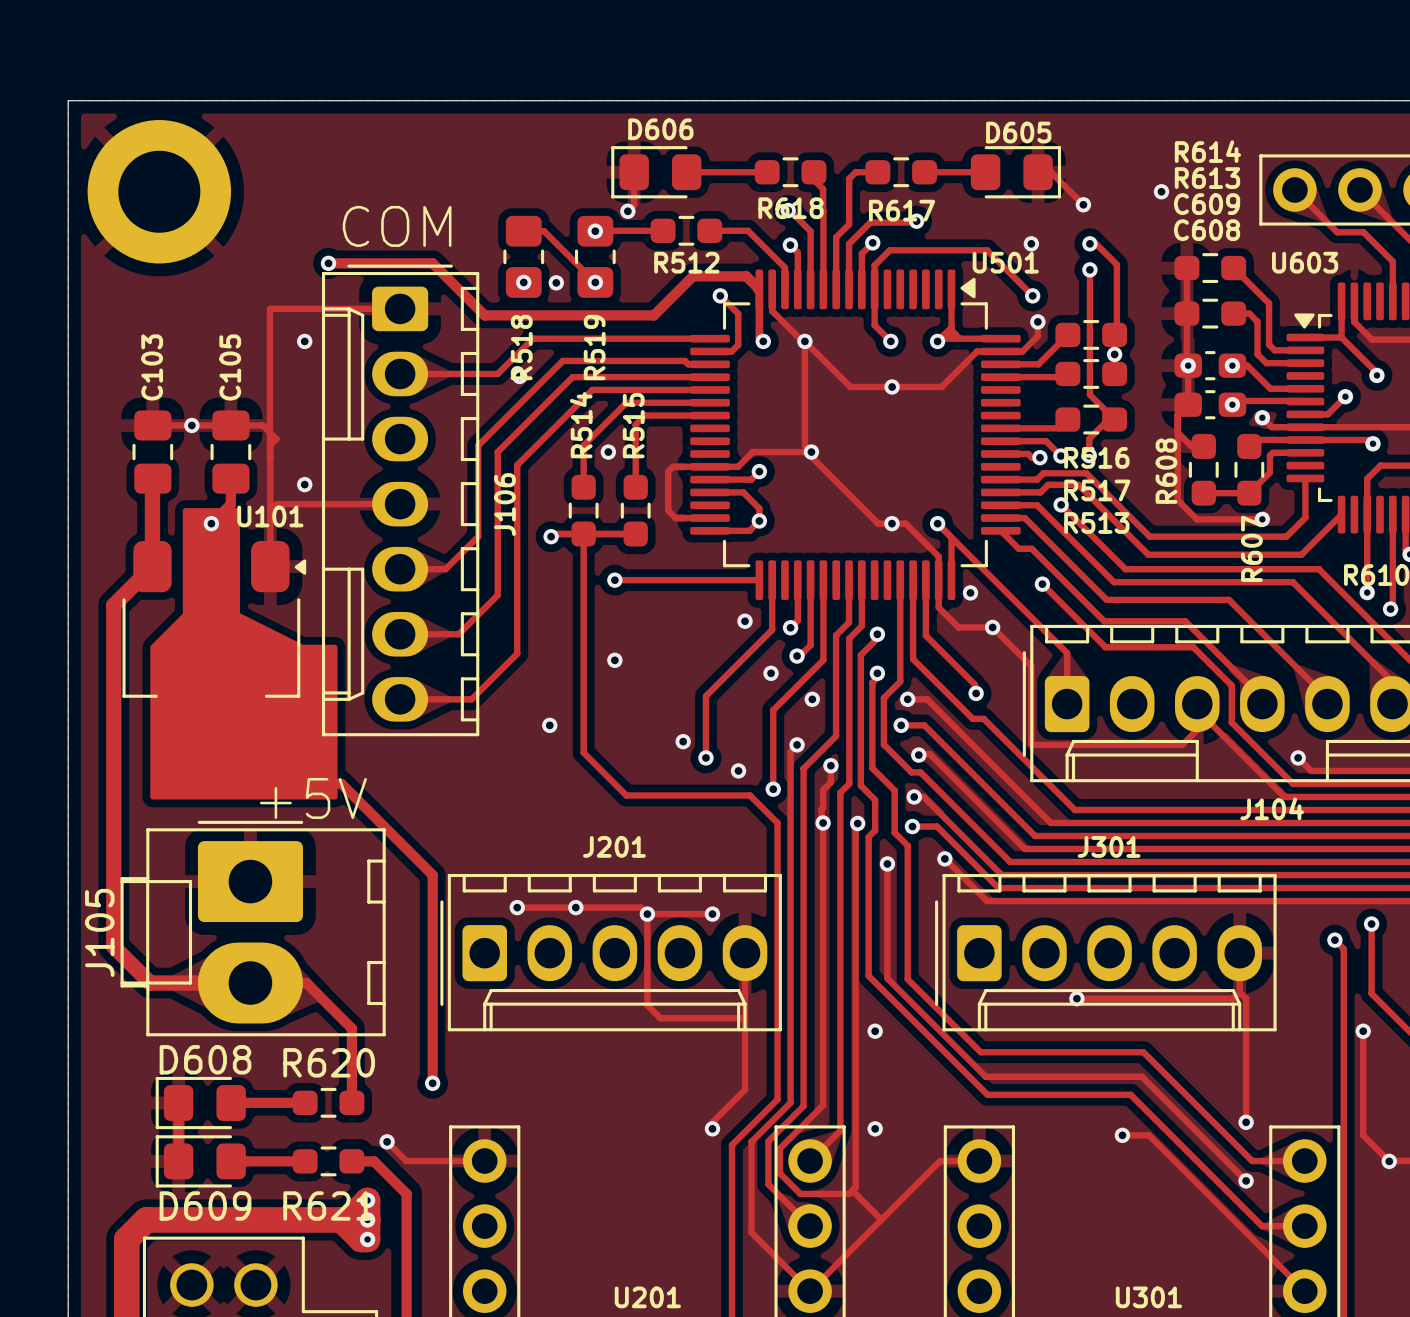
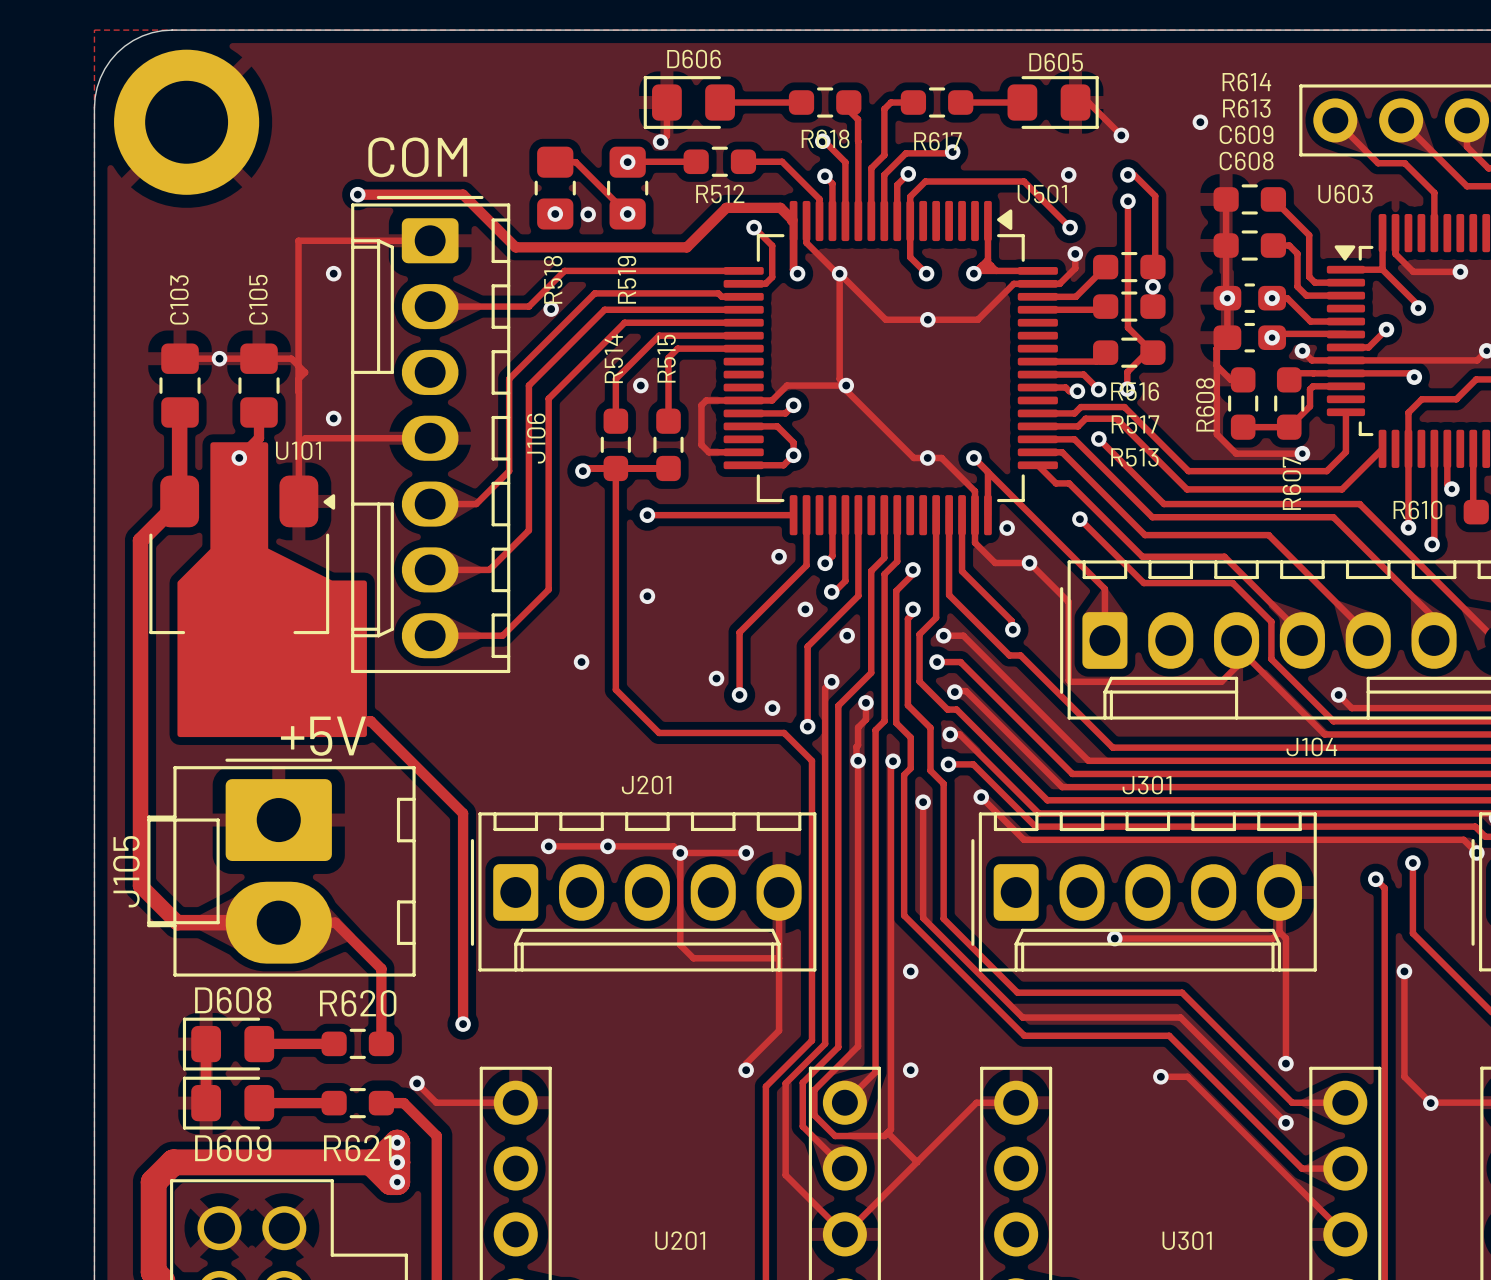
board edge: (145, 100) (68, 100) (68, 177) -> (172, 30) (142, 36) (117, 52) (100, 78) (94, 107)

